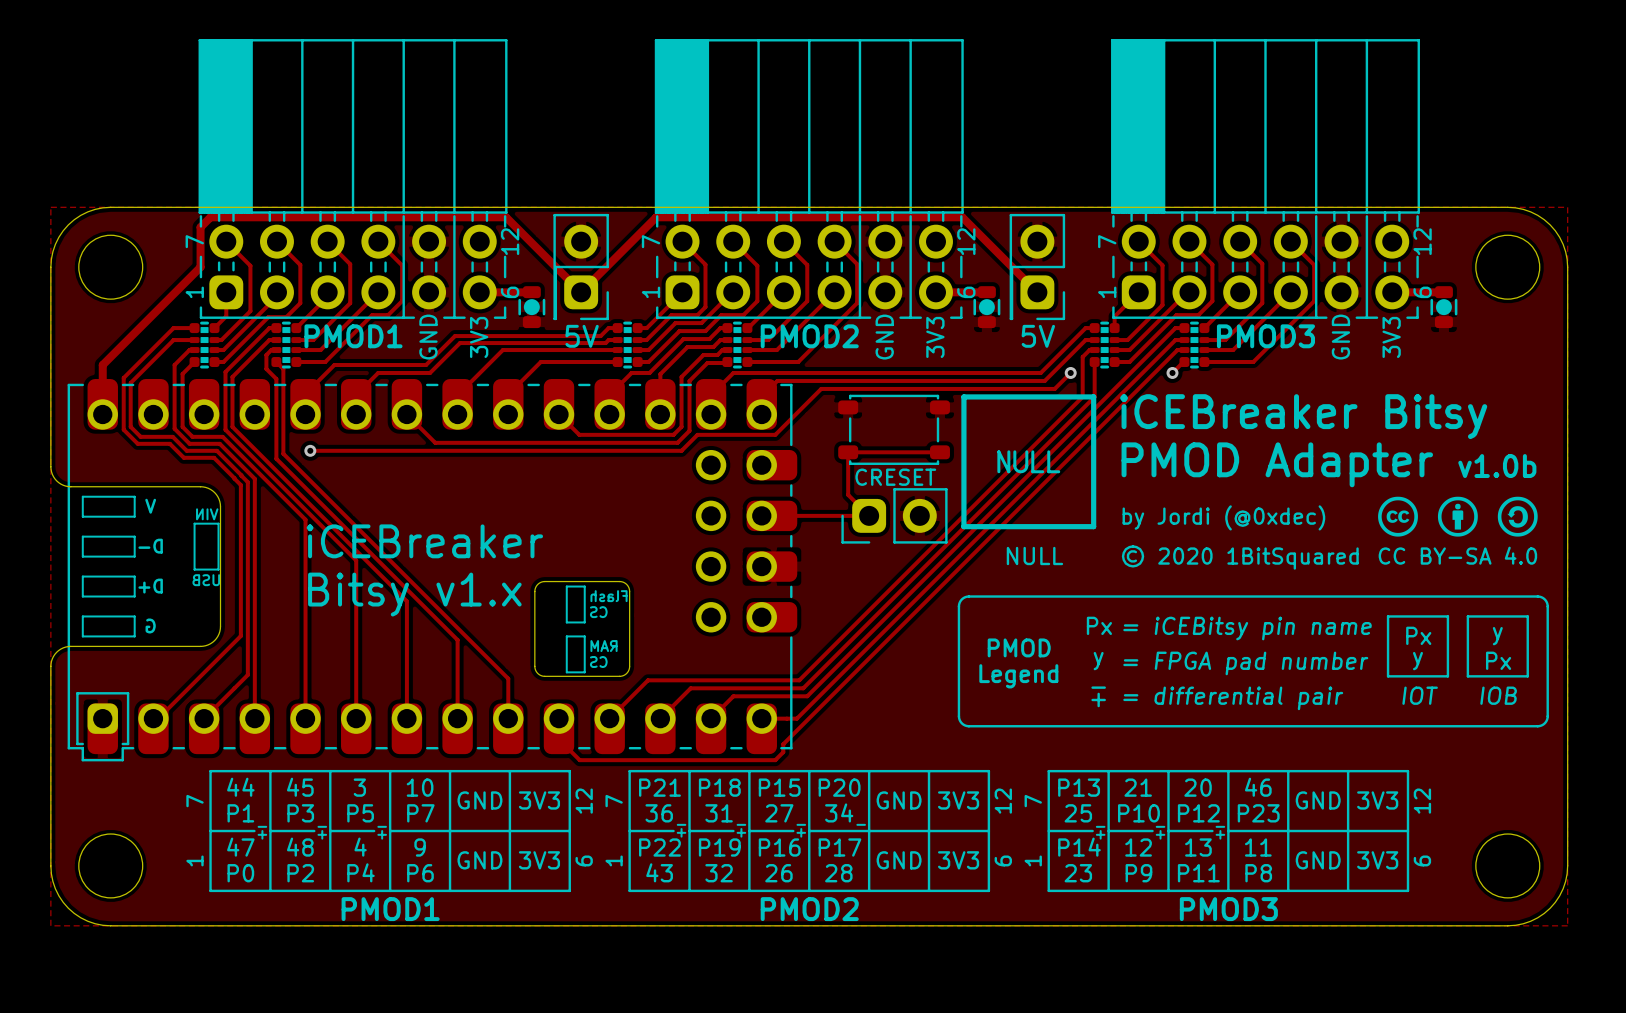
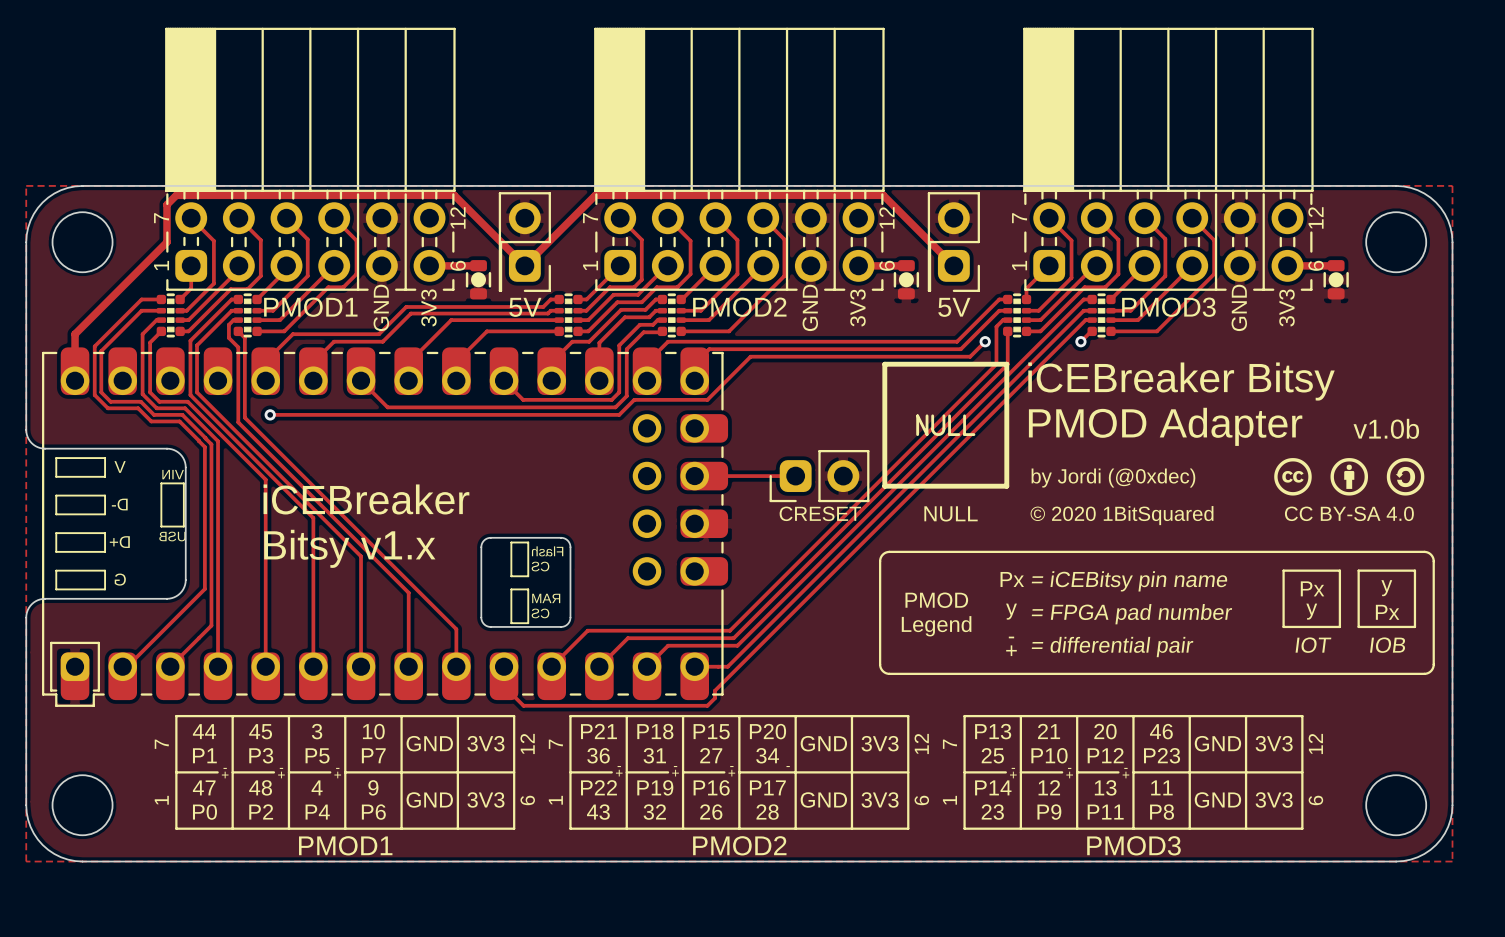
part: (894, 429) -> none
track: (939, 452) (848, 452) (848, 494) (869, 515) -> none
text position: CRESET (895, 477) -> CRESET (820, 513)

